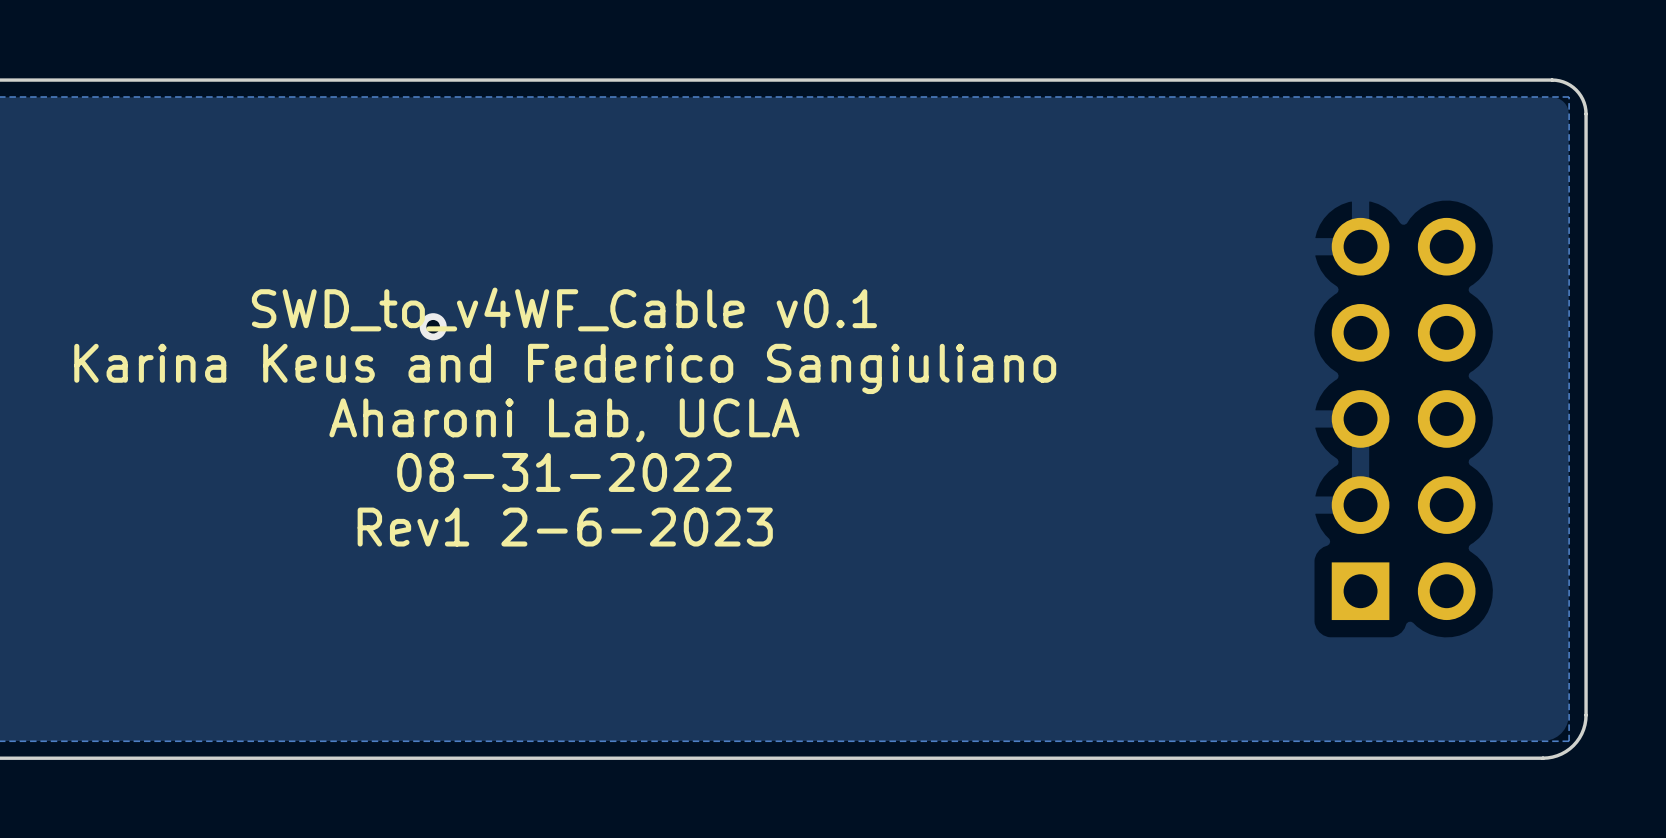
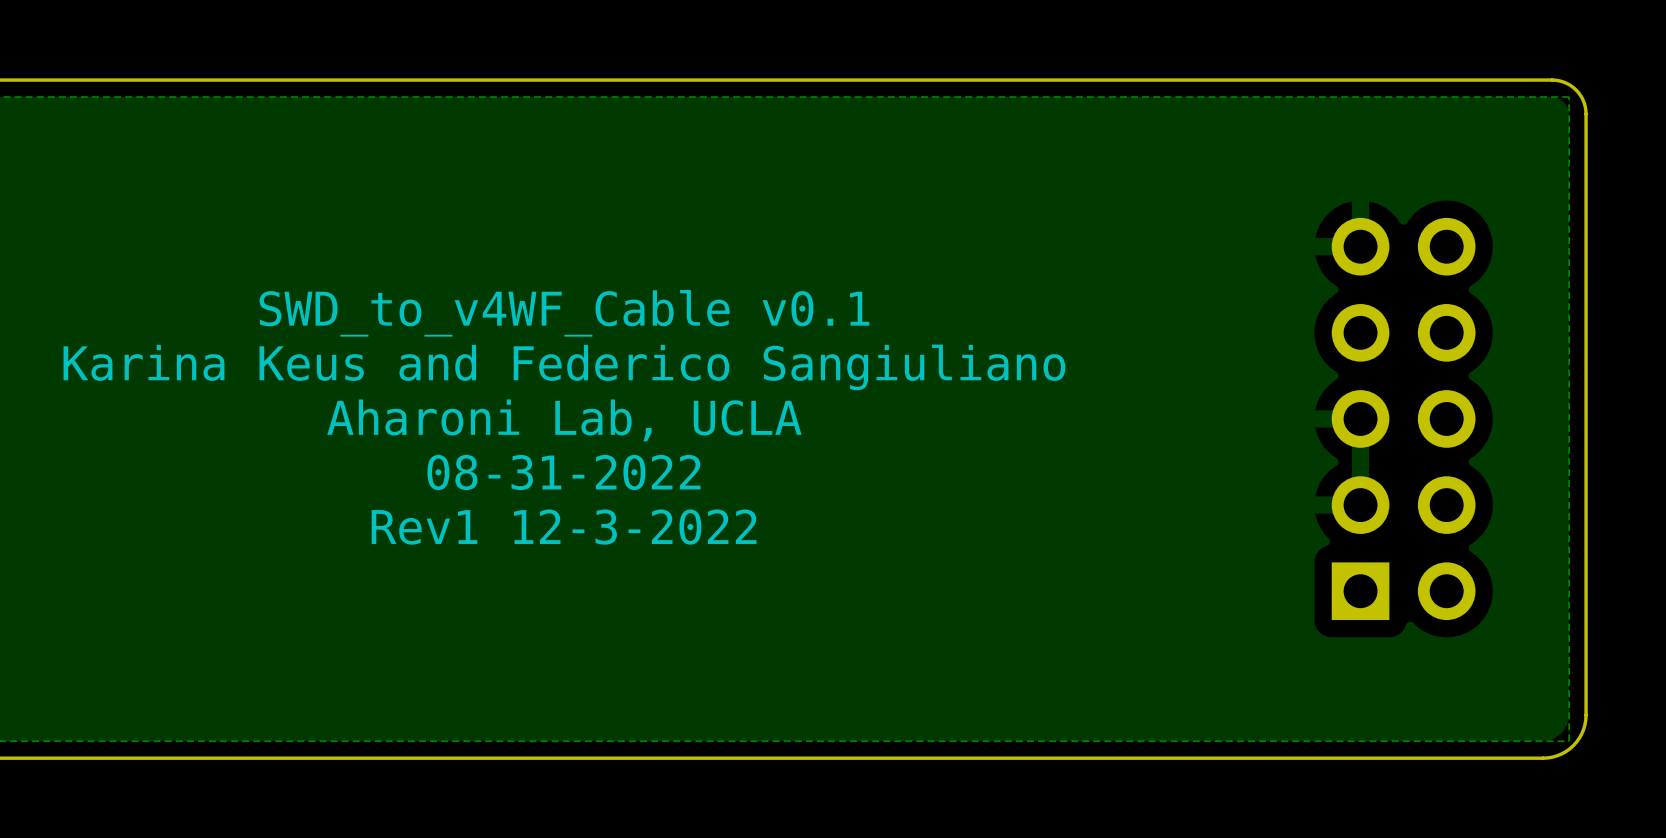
via: (433, 326) -> none
text: Rev1 2-6-2023 (565, 527) -> Rev1 12-3-2022 (564, 527)

